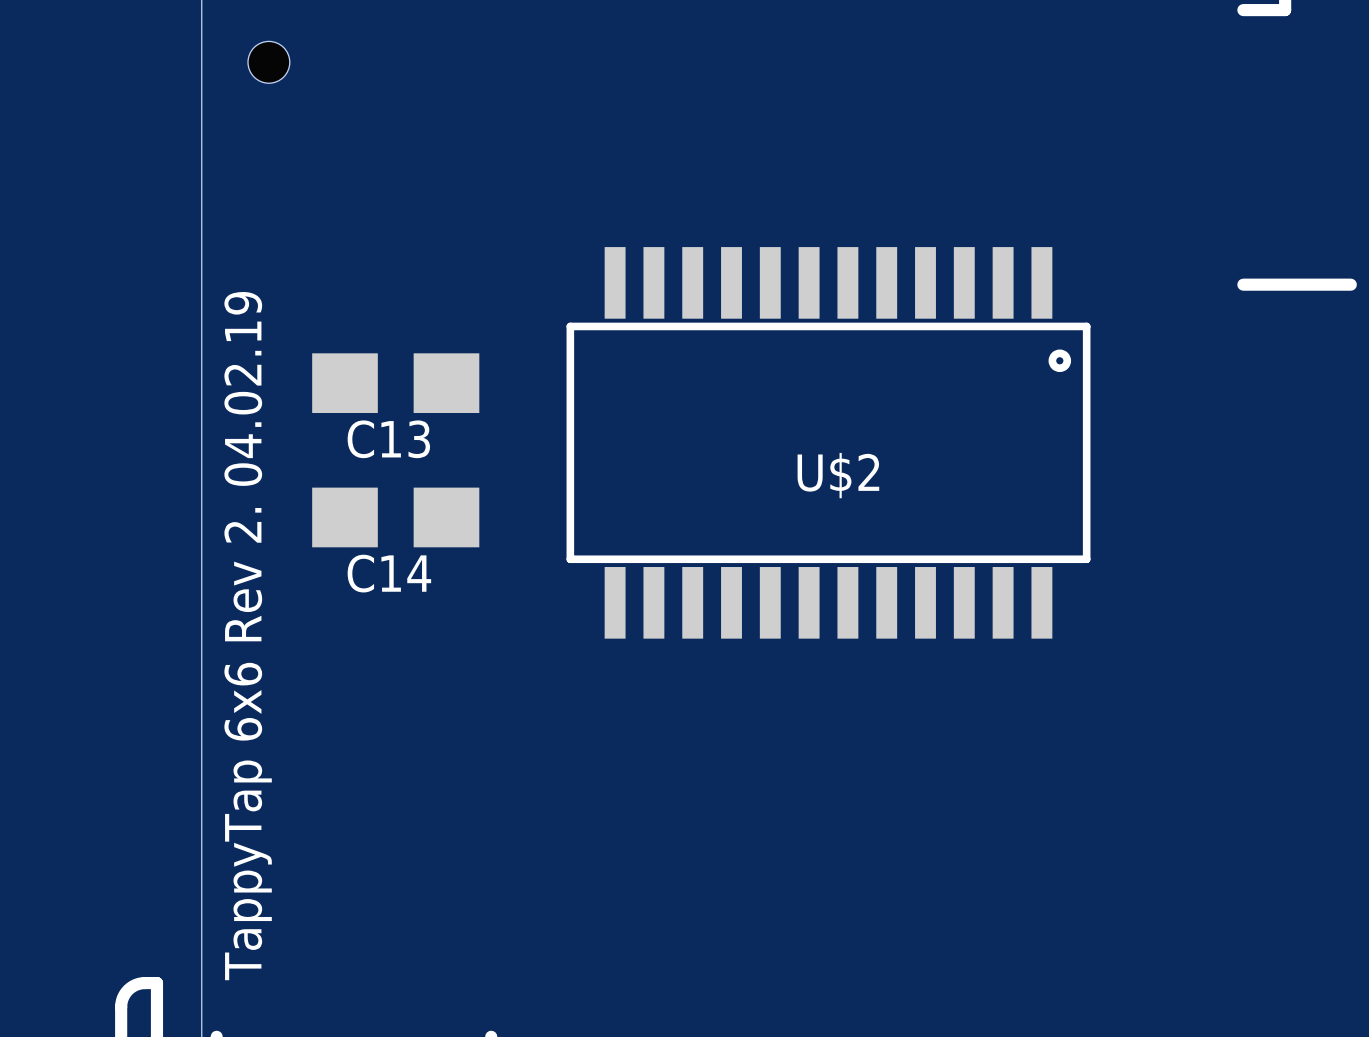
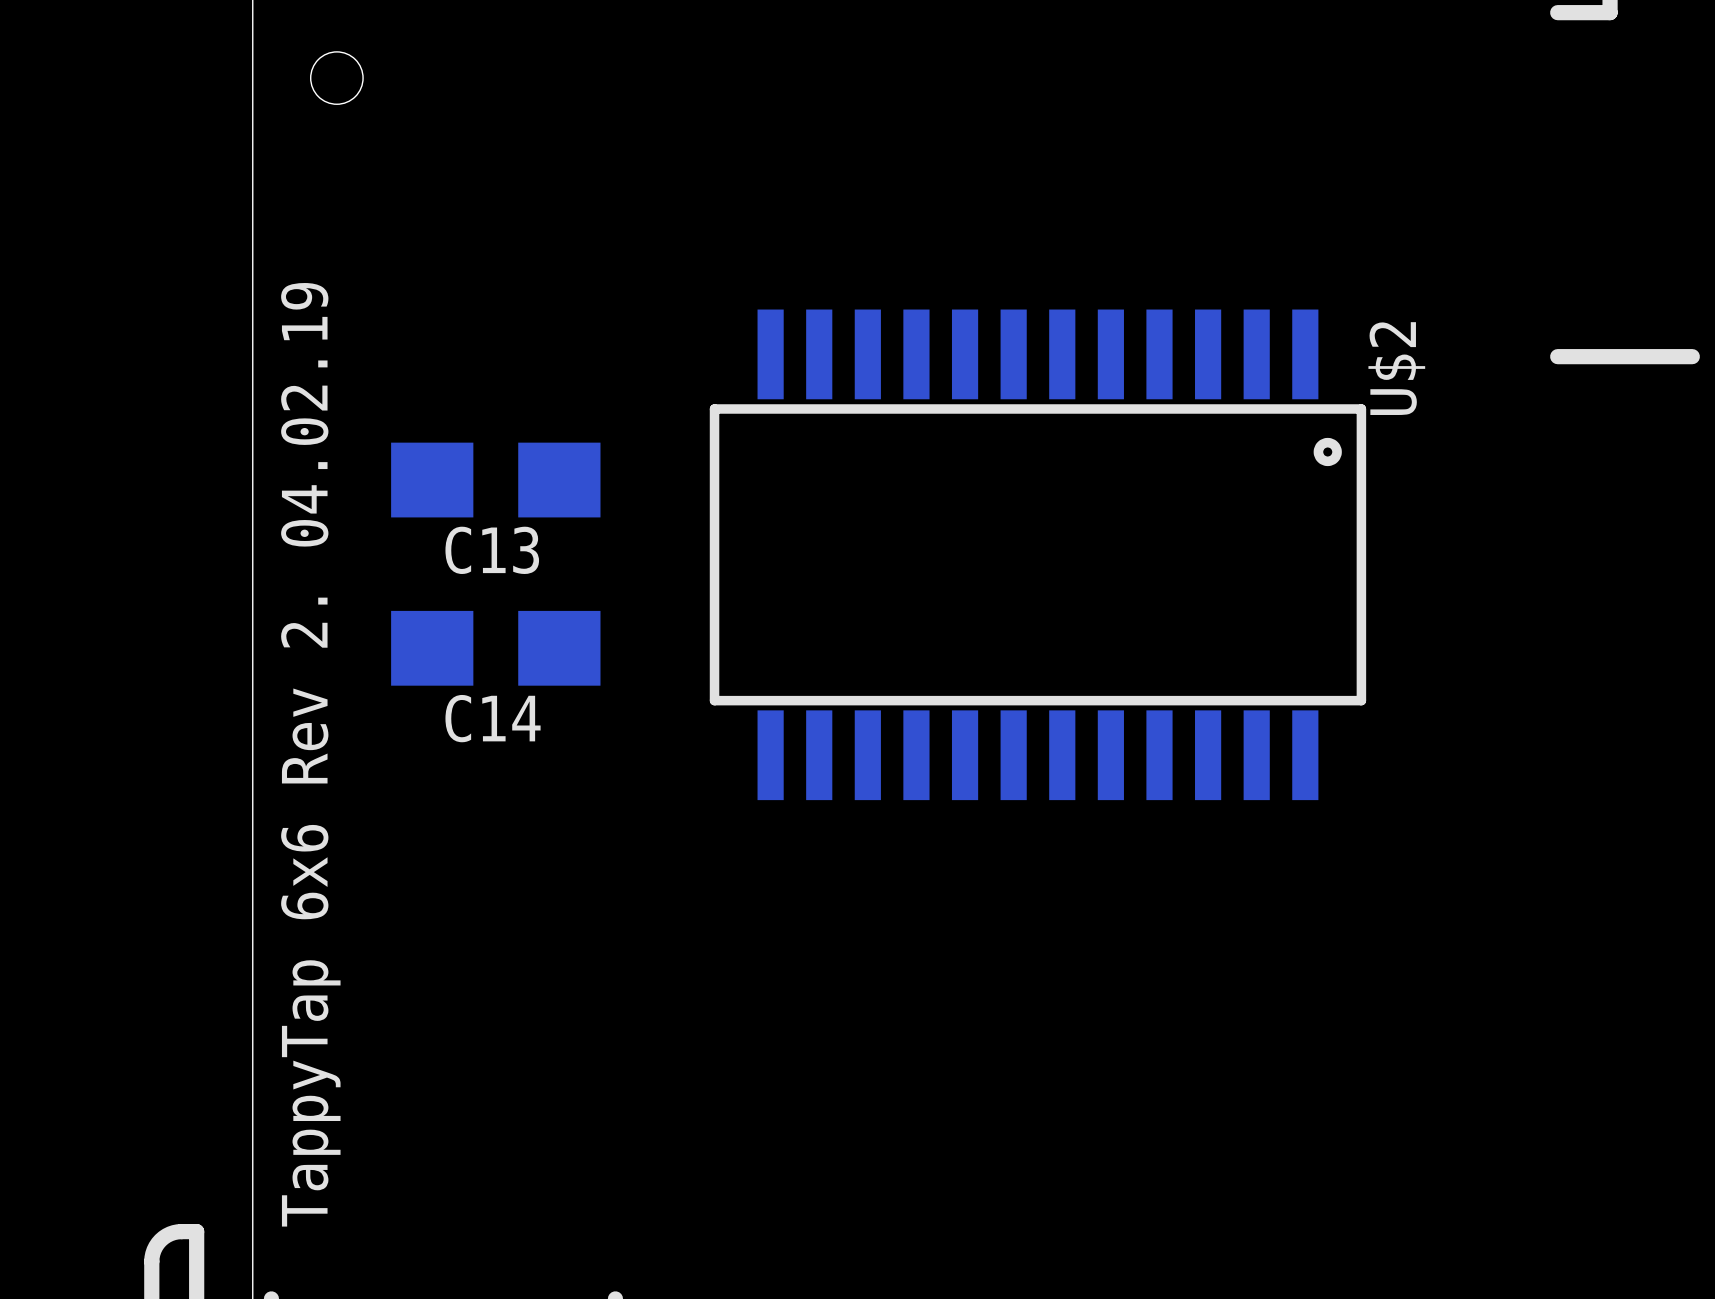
U$2 name rotation: 0° (838, 475) -> 90° counterclockwise (1396, 368)
U$2 name position: U$2 (838, 475) -> U$2 (1396, 368)

